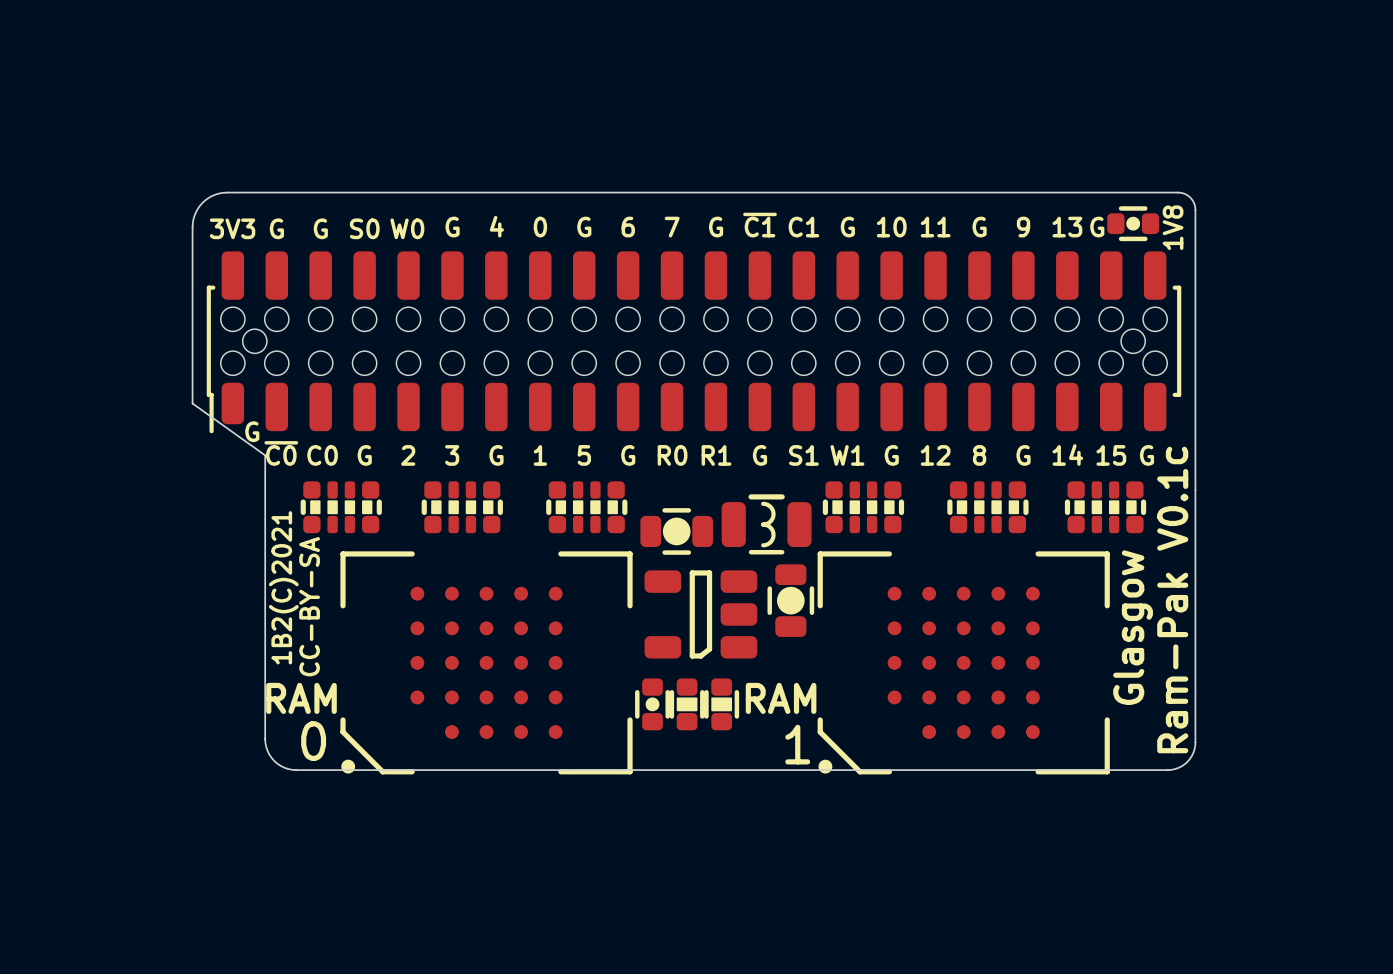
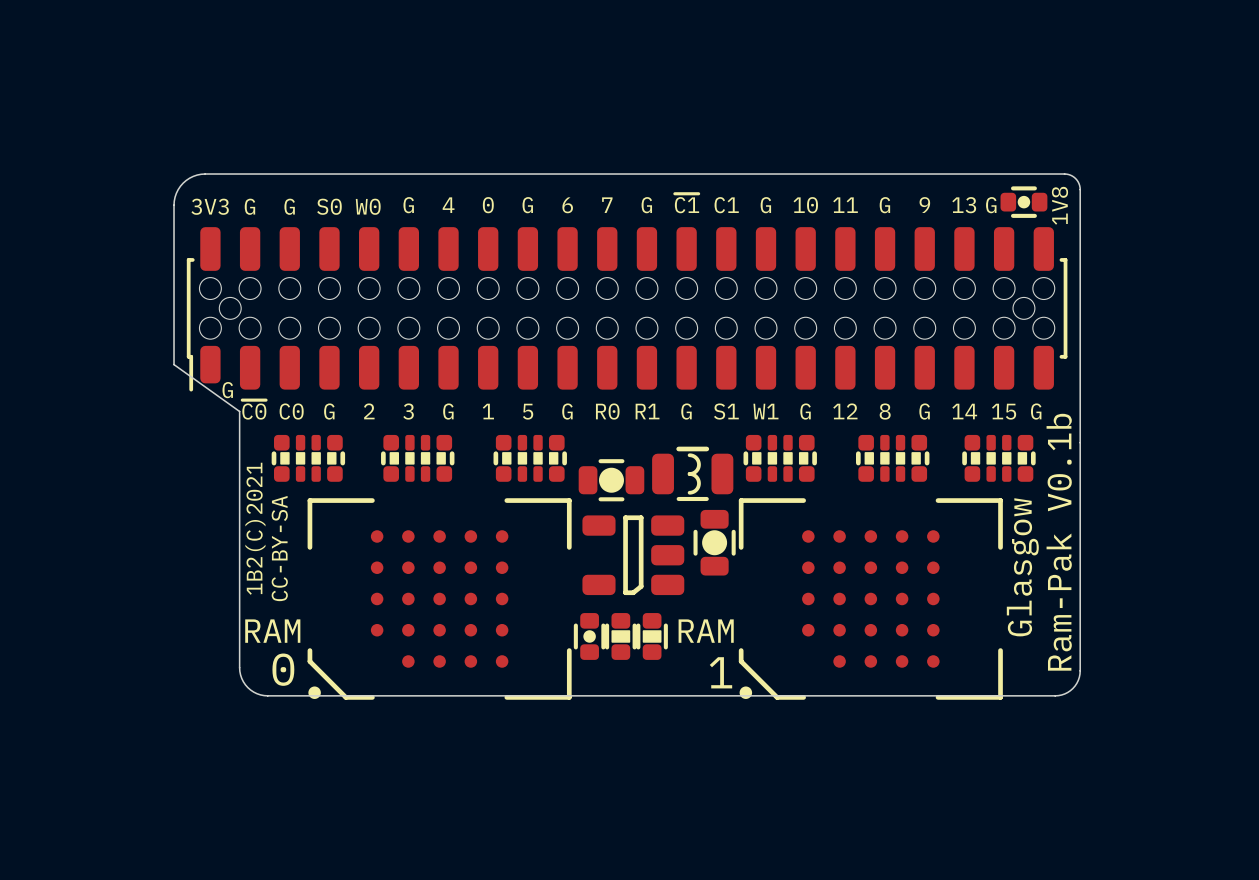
text: Ram-Pak V0.1c (1172, 600) -> Ram-Pak V0.1b (1059, 542)

